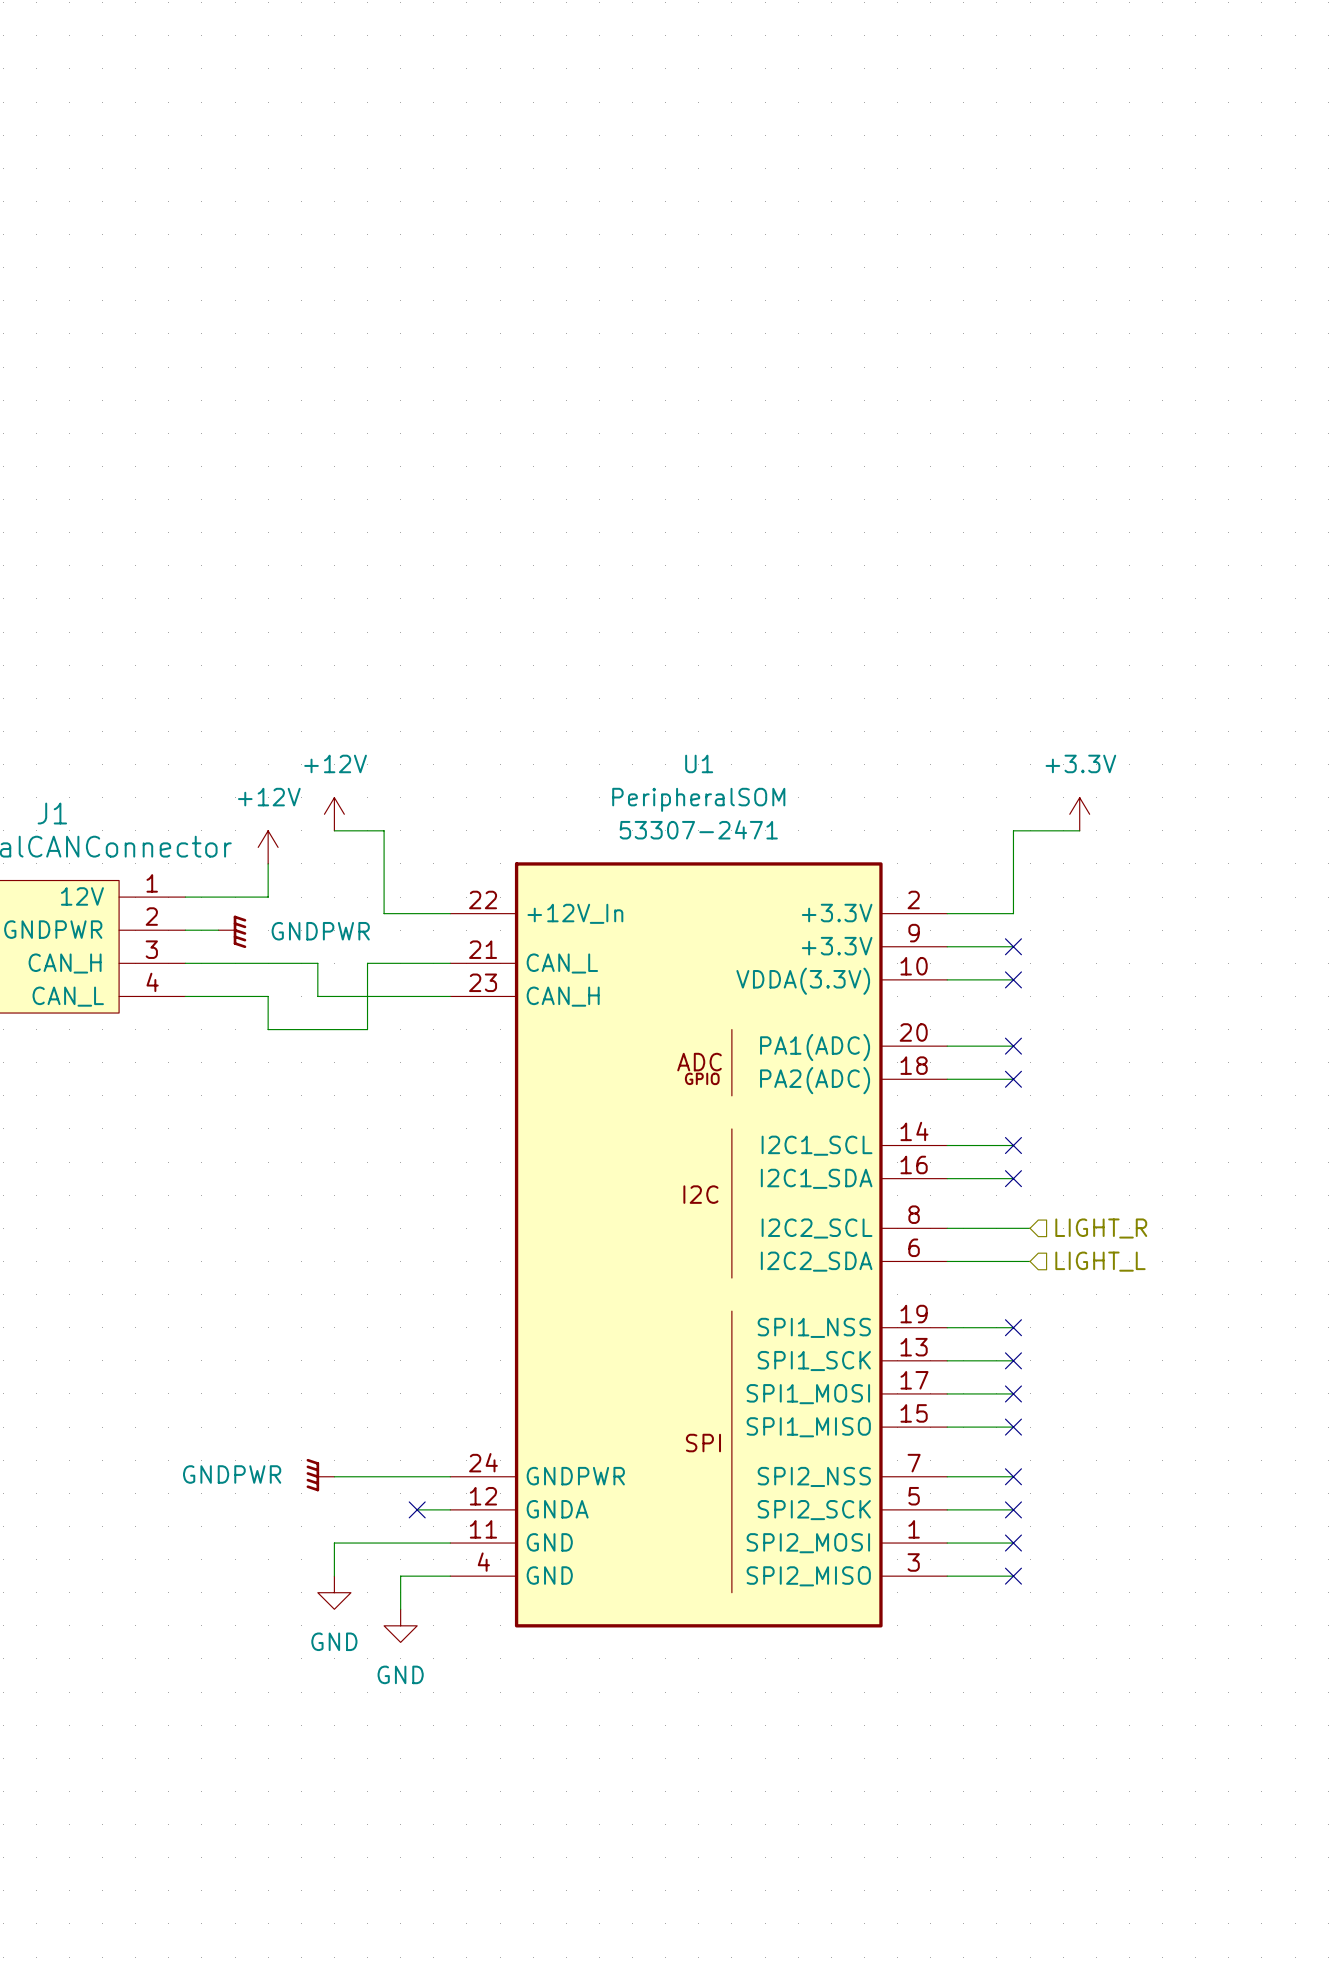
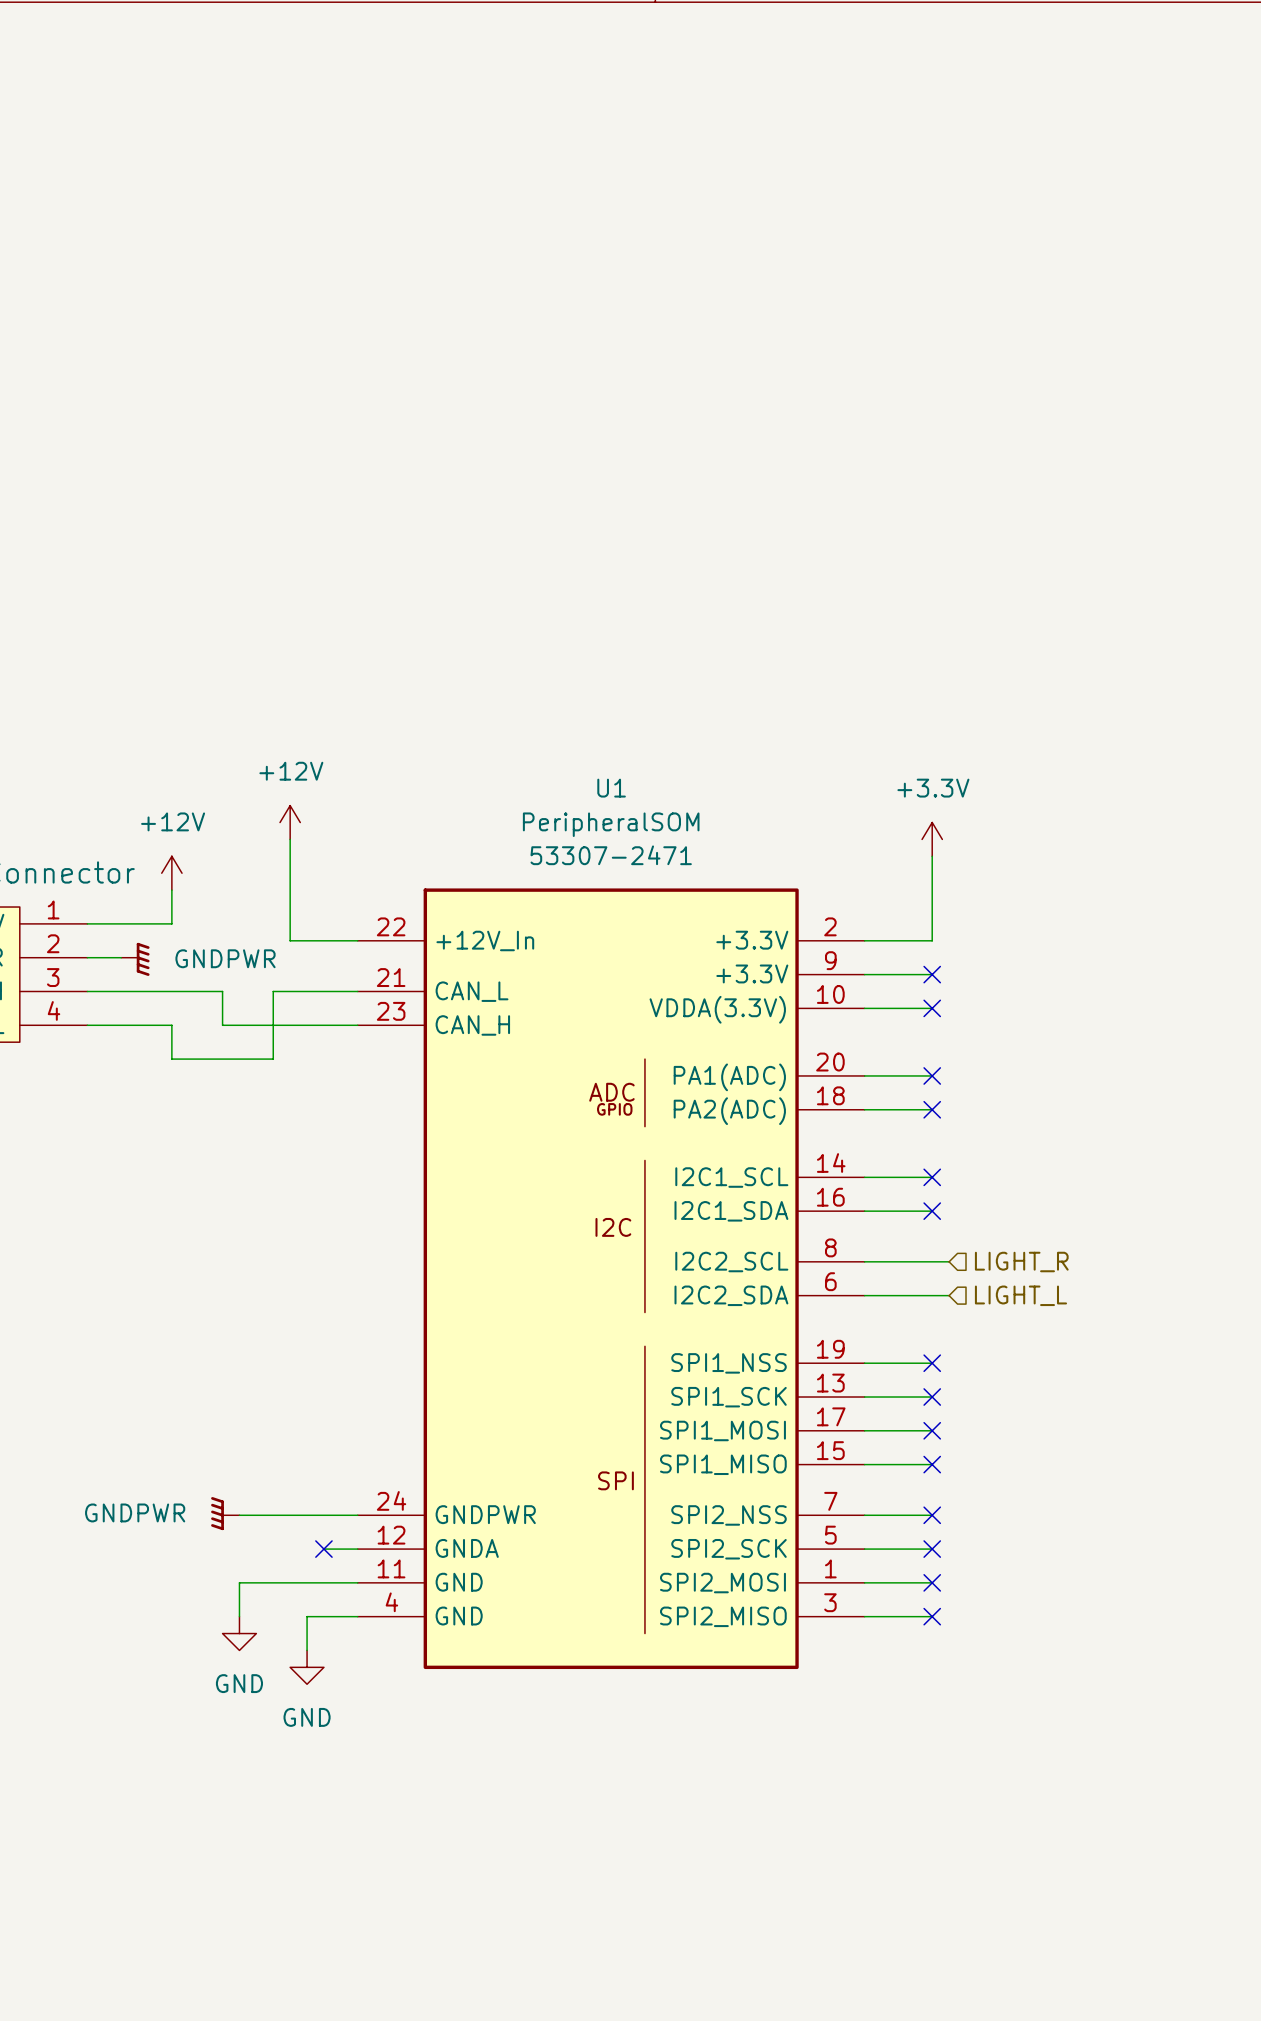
power symbol position: +12V (334, 814) -> +12V (290, 822)
power symbol position: +3.3V (1079, 814) -> +3.3V (932, 839)
wire: (334, 830) (384, 830) -> (290, 839) (290, 856)
wire: (1013, 830) (1079, 830) -> none

